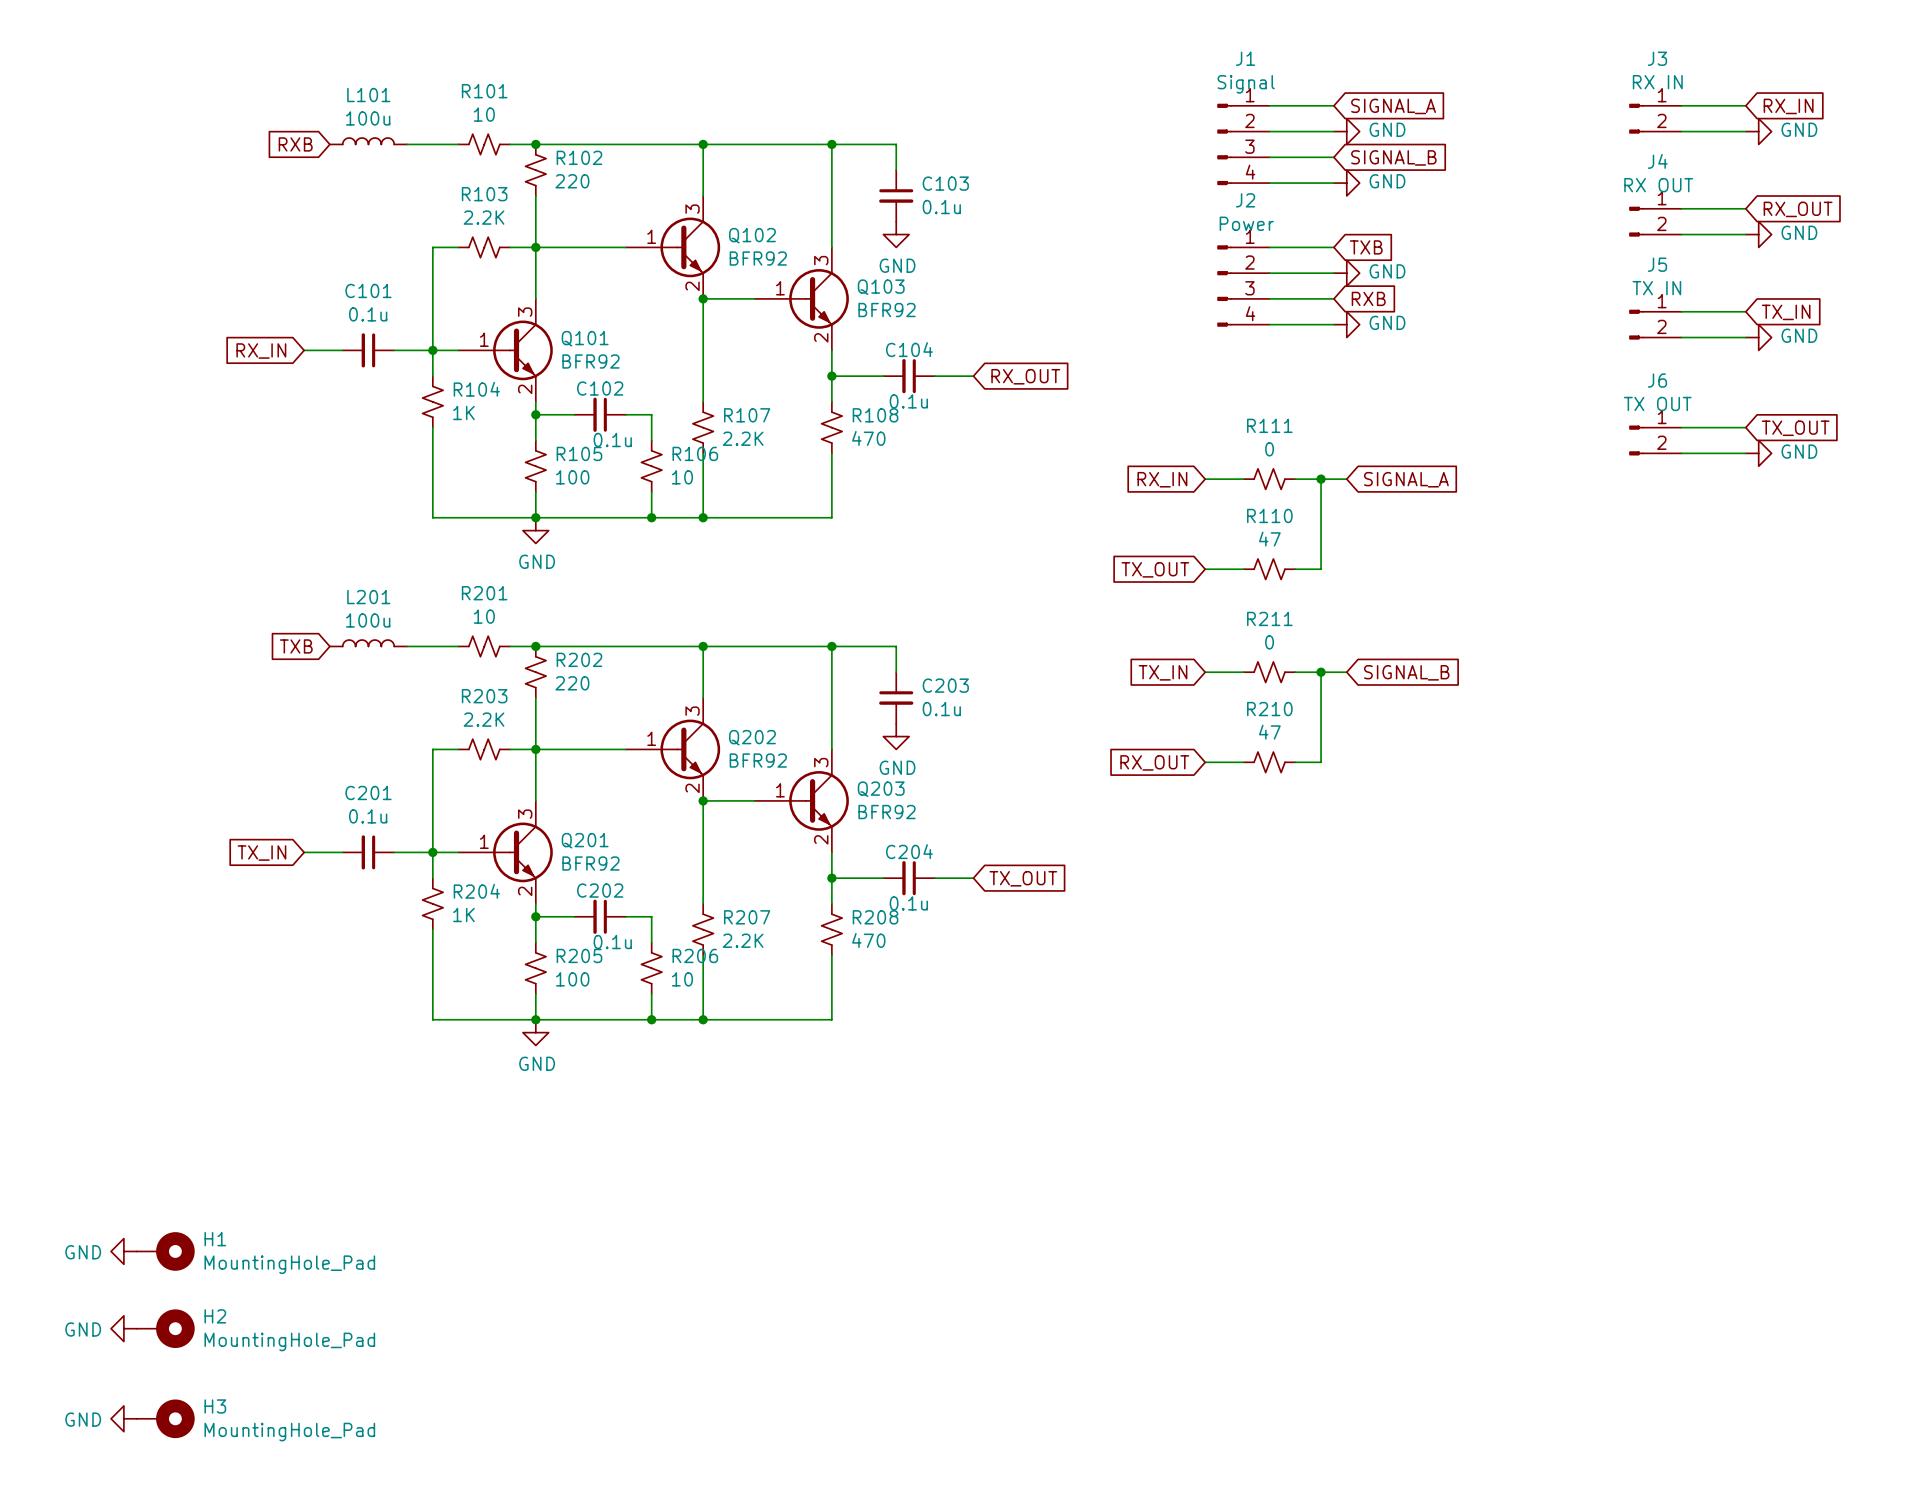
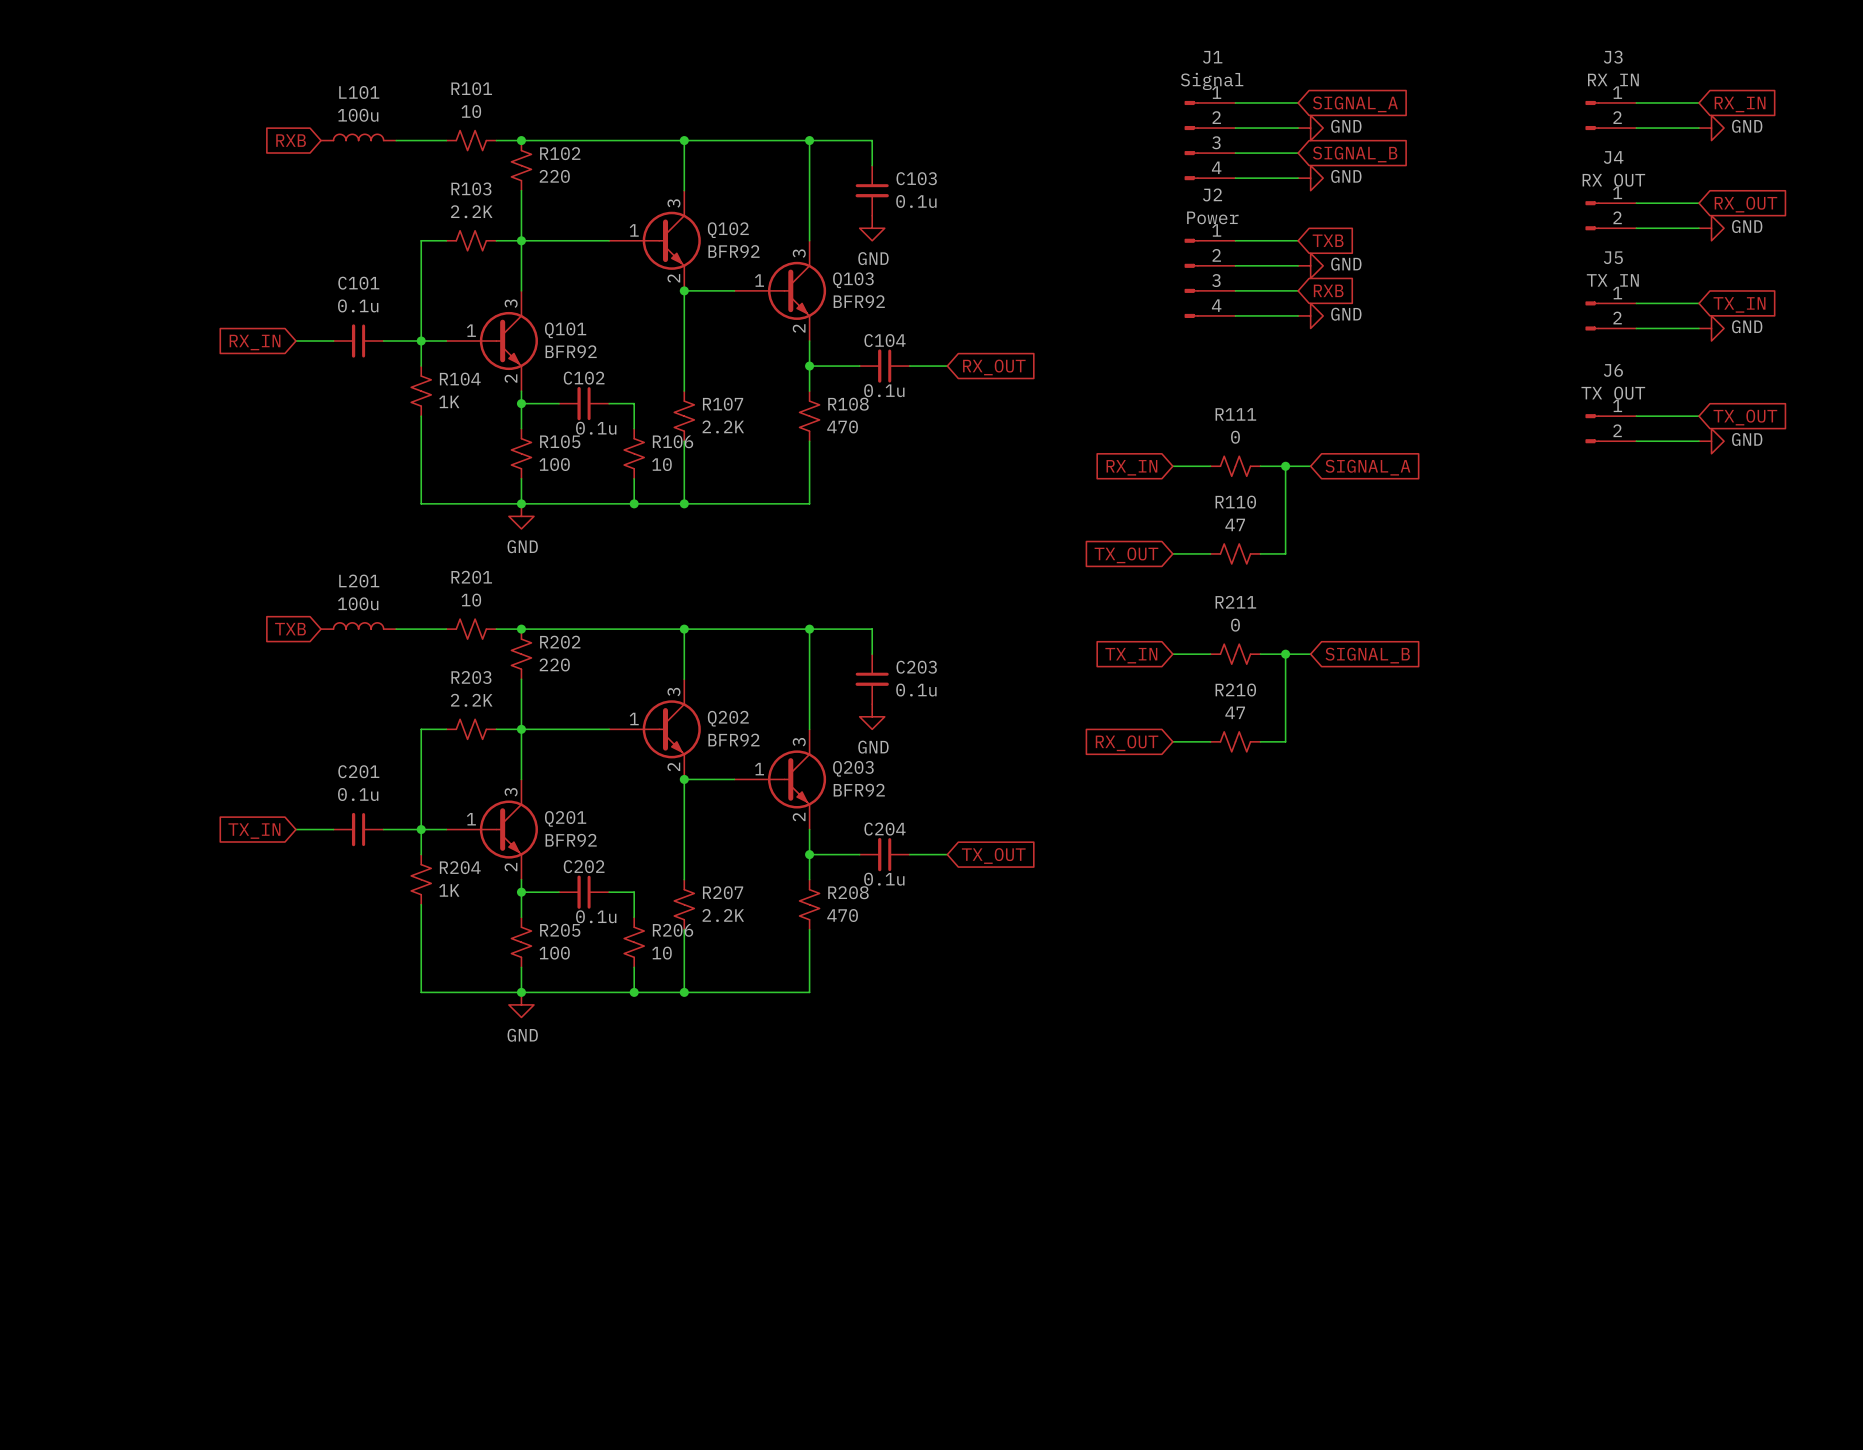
power symbol: GND (123, 1251) -> none
H1: MountingHole_Pad (165, 1251) -> none
power symbol: GND (123, 1328) -> none
H2: MountingHole_Pad (165, 1328) -> none
power symbol: GND (123, 1418) -> none
H3: MountingHole_Pad (165, 1418) -> none

